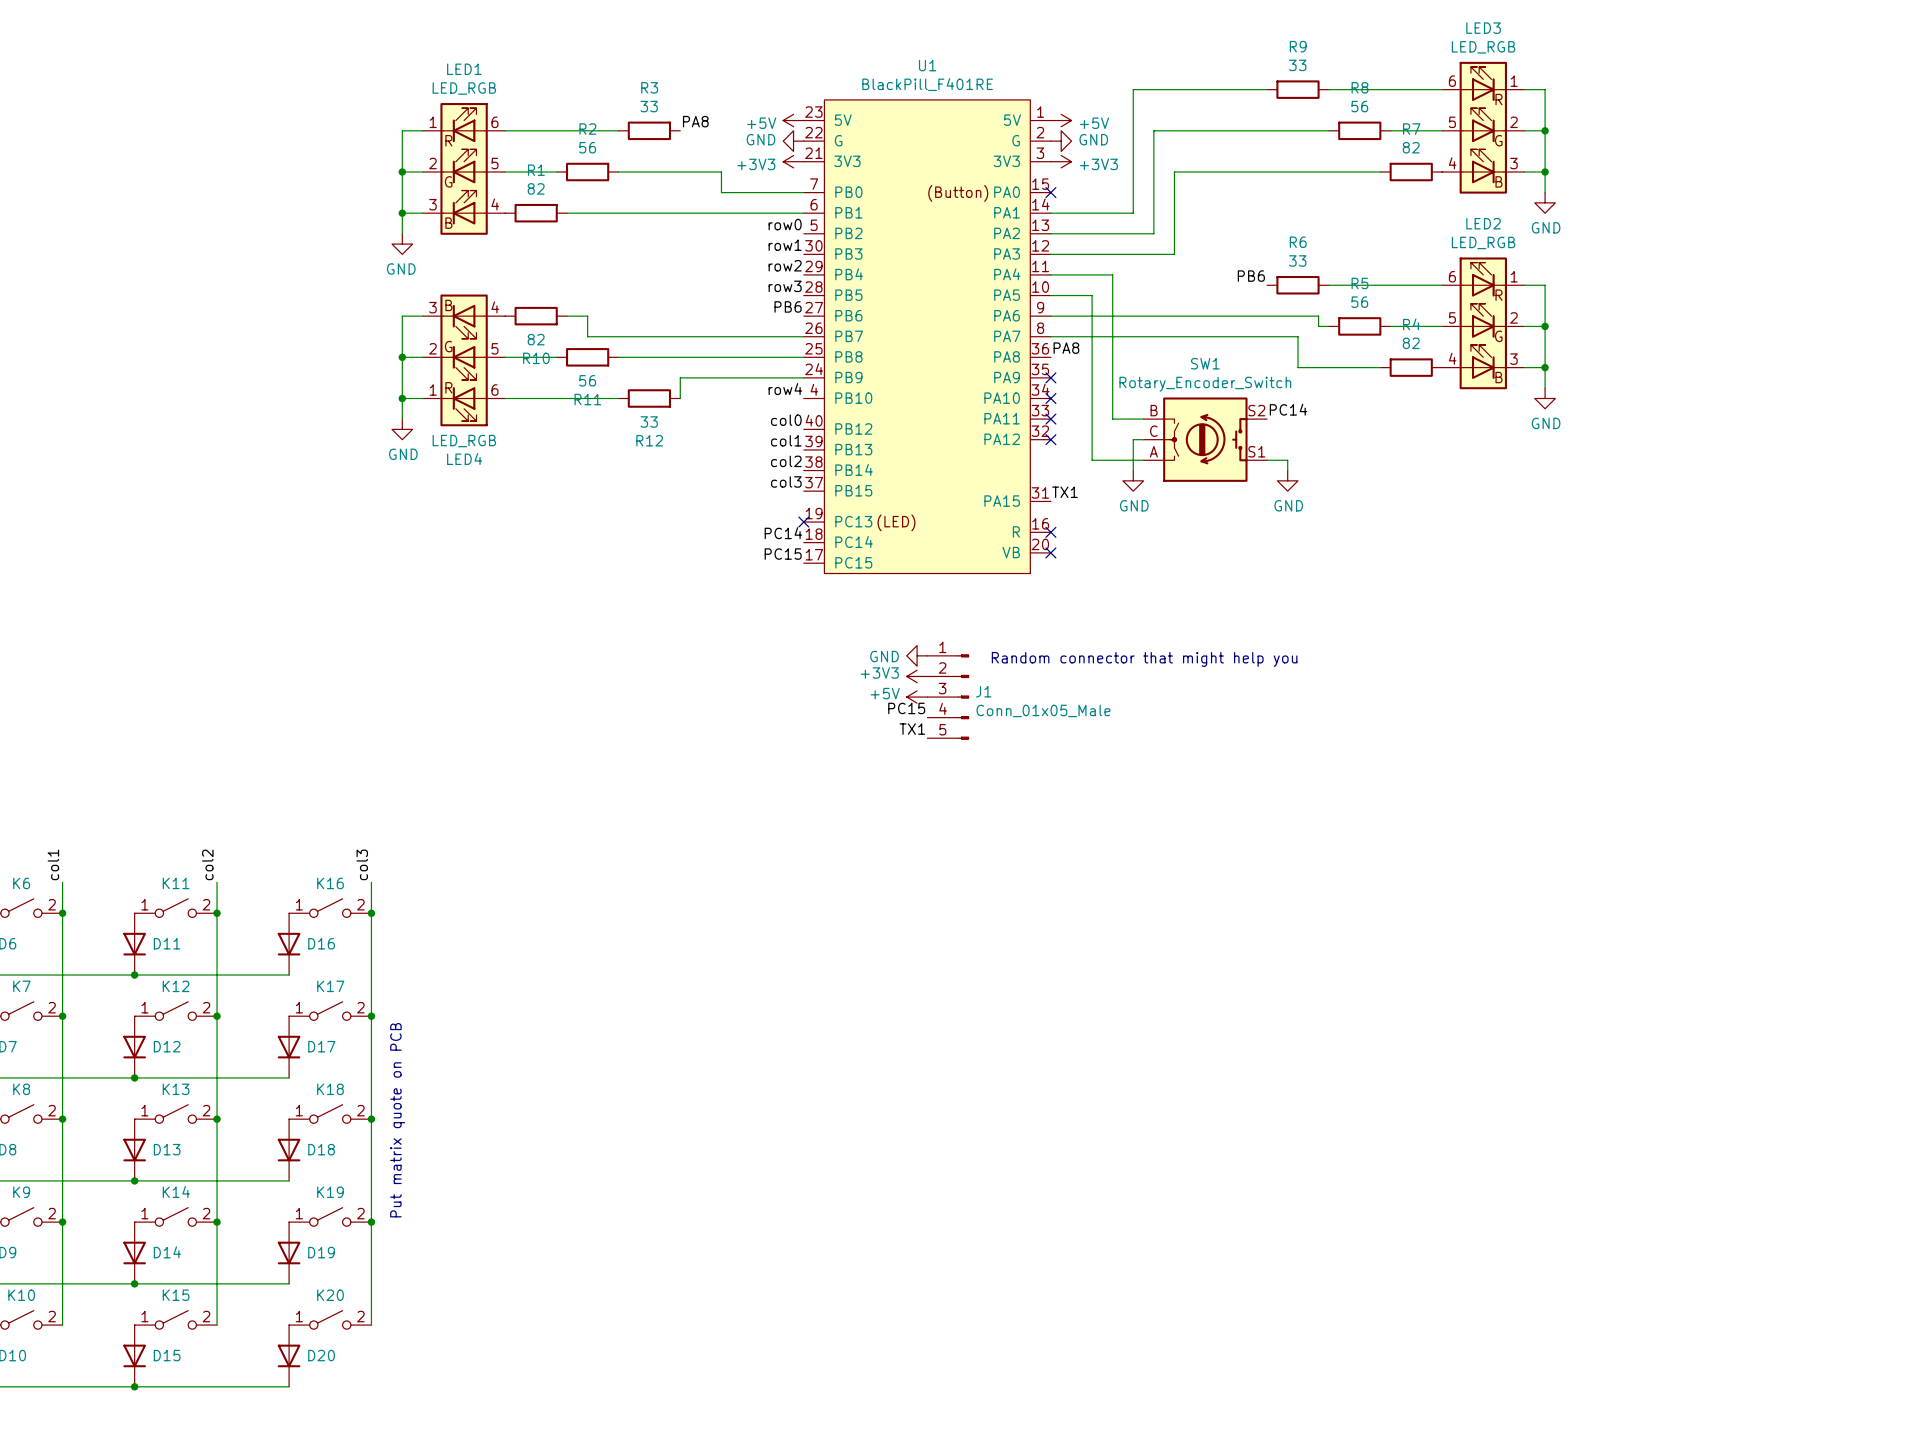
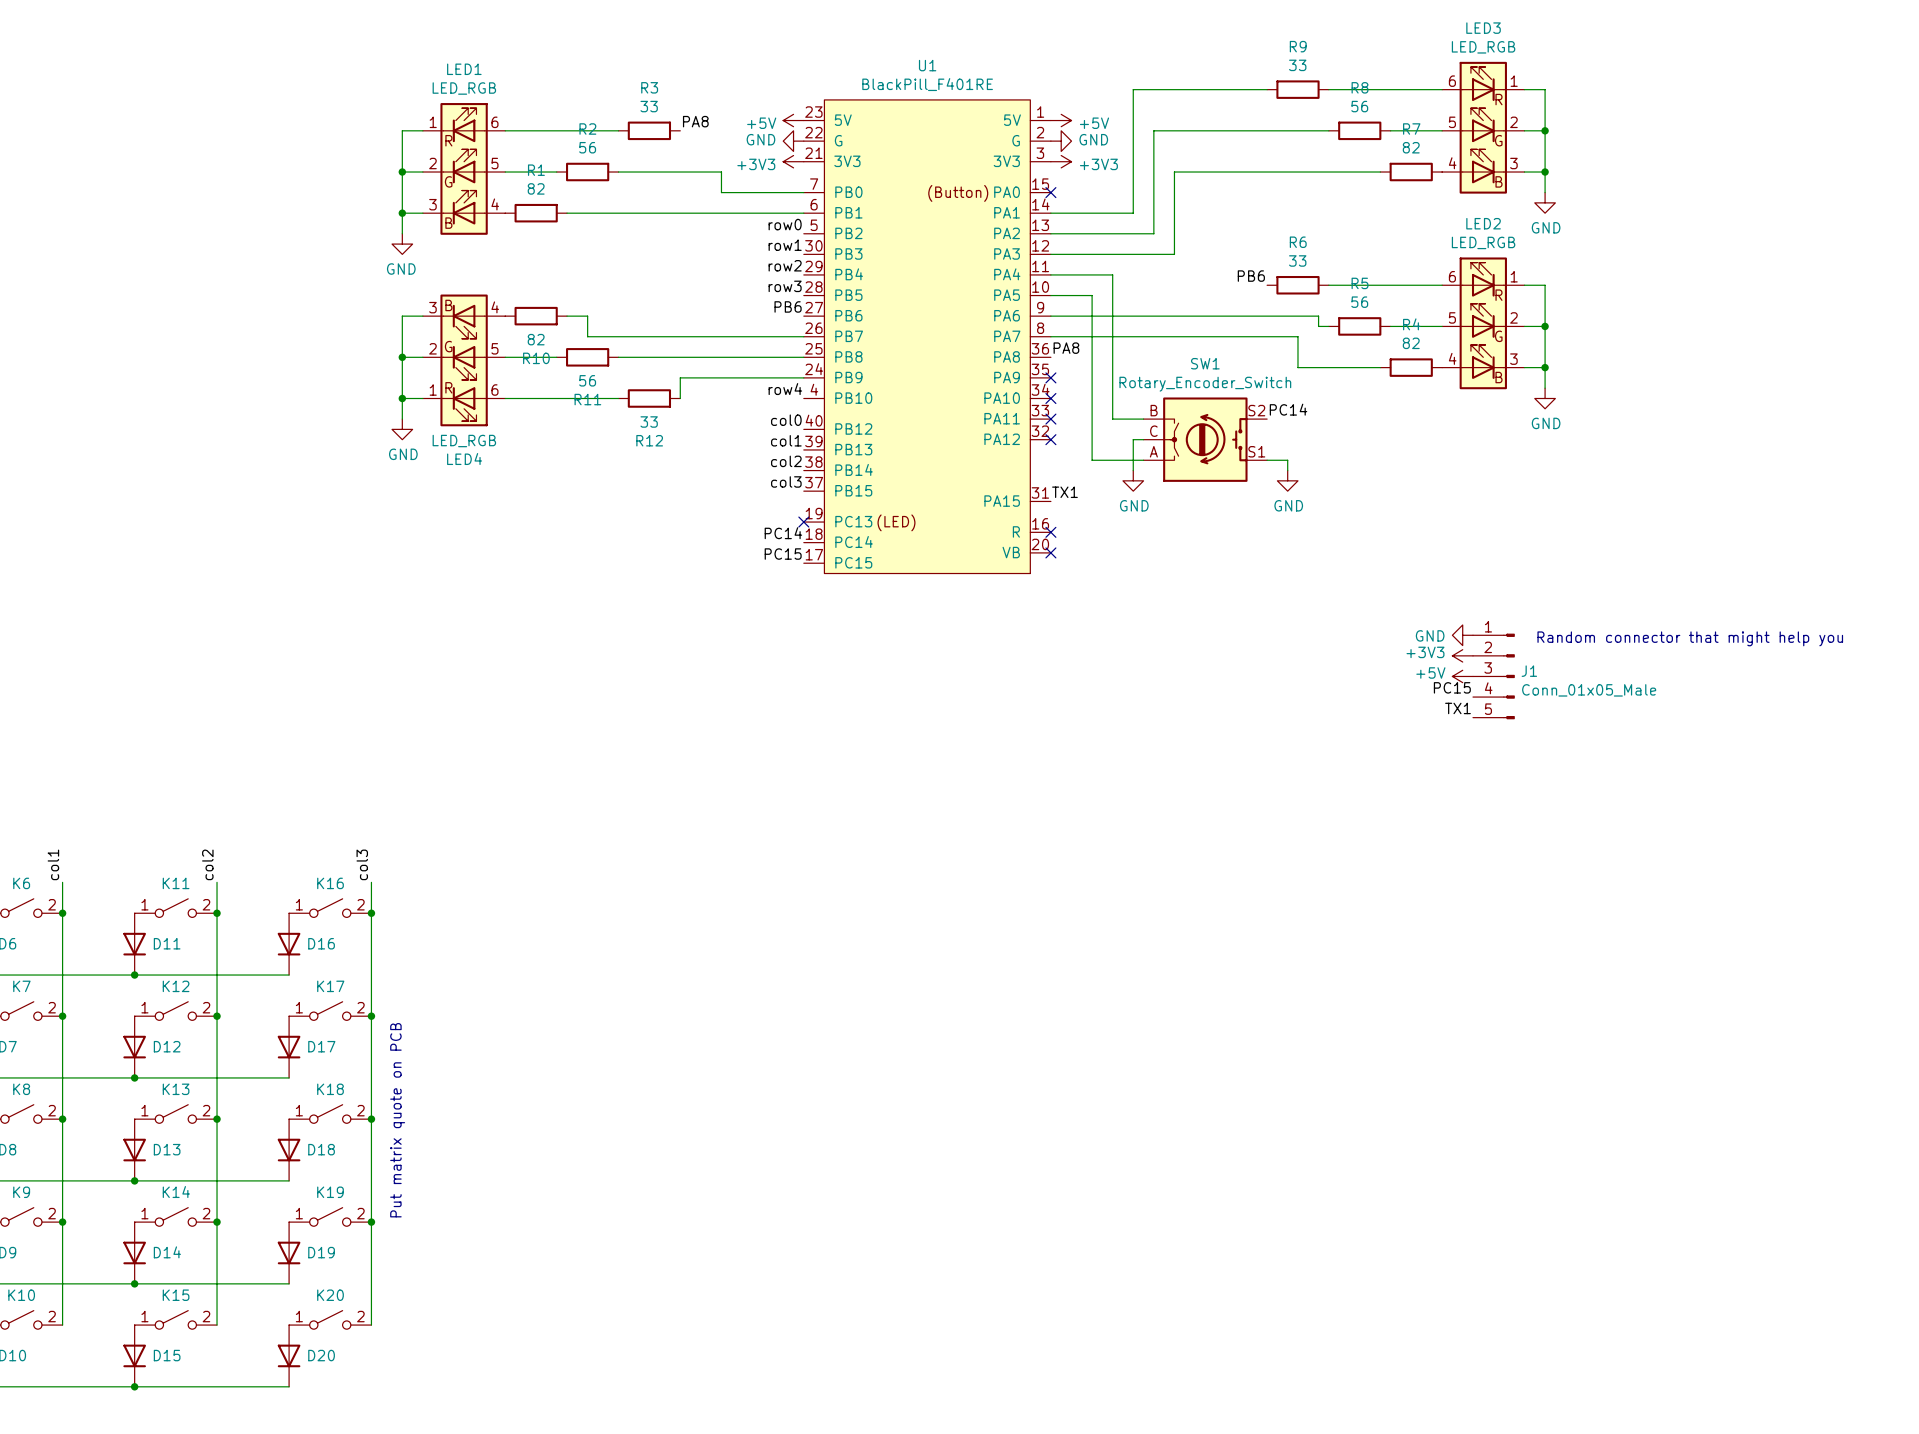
power symbol: none -> GND (1462, 635)
text: none -> Random connector that might help you (1690, 638)
power symbol: GND (917, 655) -> none
power symbol: none -> +3V3 (1462, 655)
text: Random connector that might help you (1144, 659) -> none
power symbol: +3V3 (917, 676) -> none
power symbol: none -> +5V (1462, 676)
label: none -> PC15 (1452, 687)
power symbol: +5V (917, 697) -> none
J1 position: (948, 697) -> (1493, 676)
label: PC15 (906, 708) -> none
label: none -> TX1 (1457, 708)
label: TX1 (912, 729) -> none

